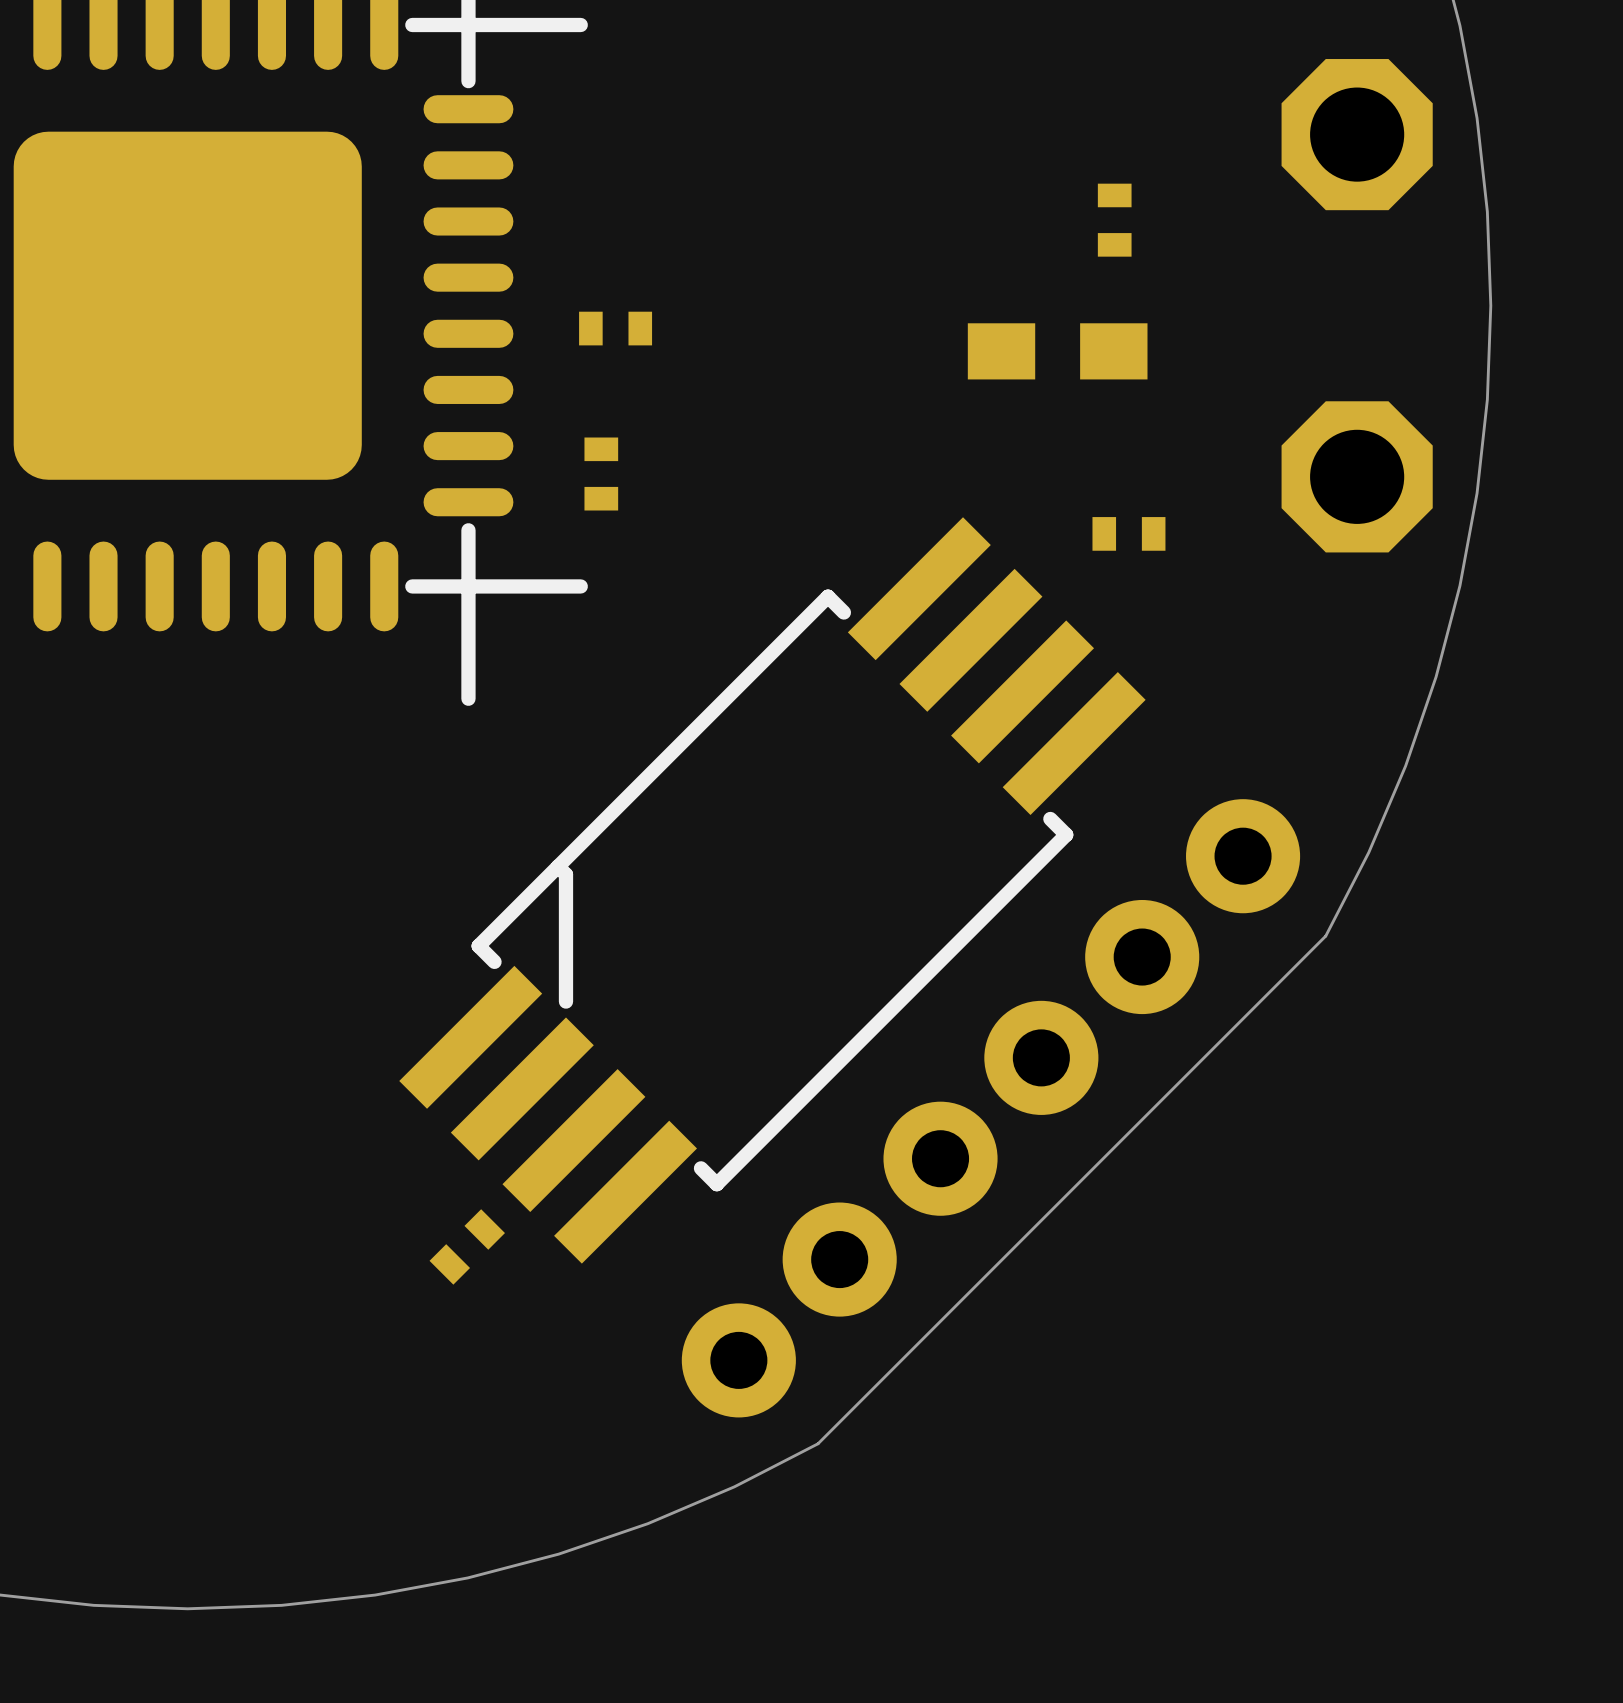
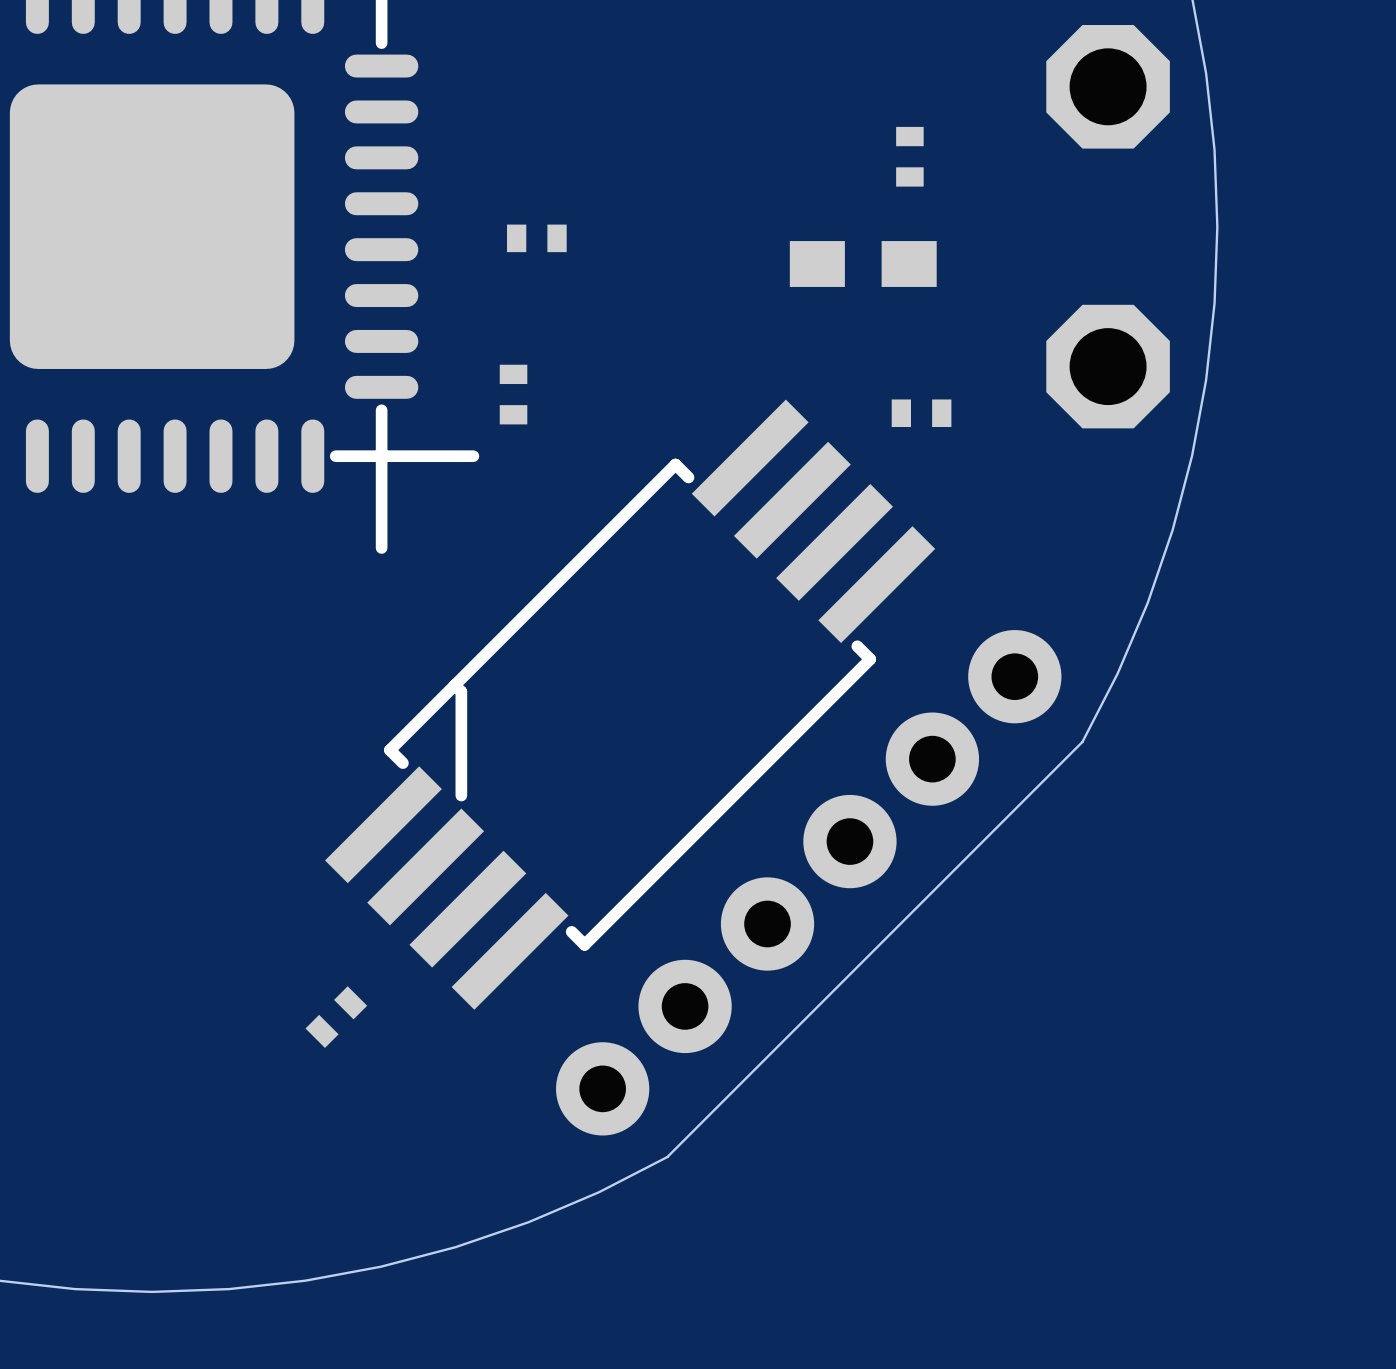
part position: (615, 328) -> (536, 238)
part position: (601, 474) -> (513, 394)
part position: (467, 1246) -> (336, 1017)

